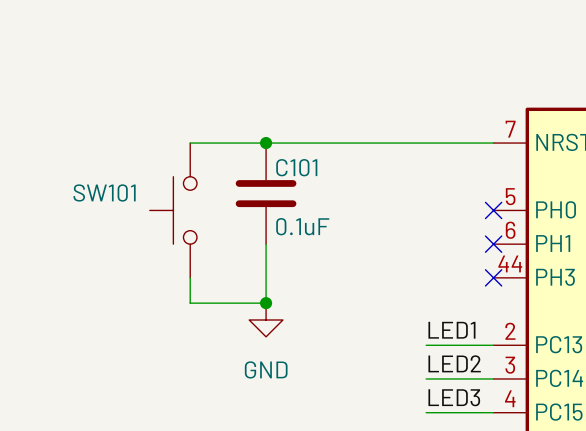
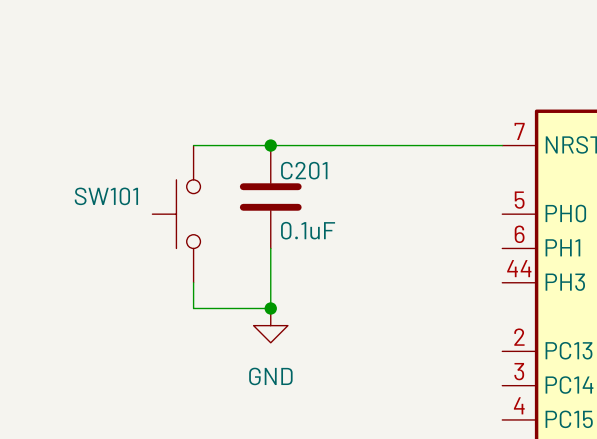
C101 name: C101 (296, 167) -> C201 (304, 170)
no-connect mark: (493, 210) -> none
no-connect mark: (493, 244) -> none
no-connect mark: (493, 277) -> none
label: LED1 (451, 330) -> none
wire: (426, 345) (493, 345) -> none
label: LED2 (454, 363) -> none
wire: (426, 378) (493, 378) -> none
label: LED3 (454, 397) -> none
wire: (426, 412) (493, 412) -> none

